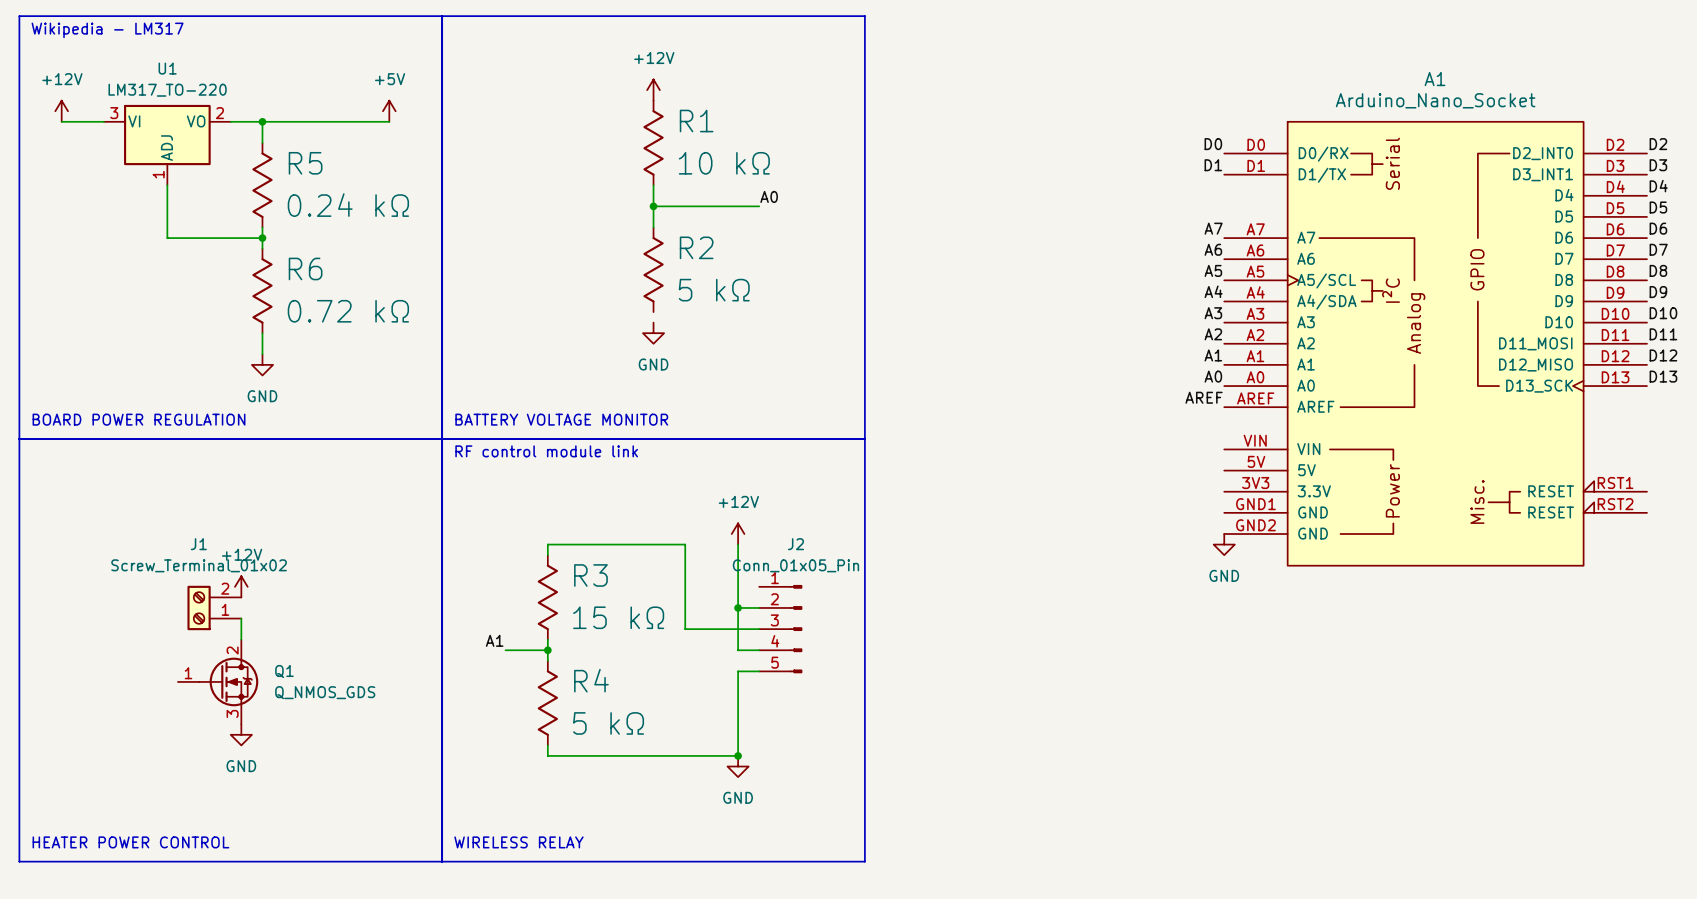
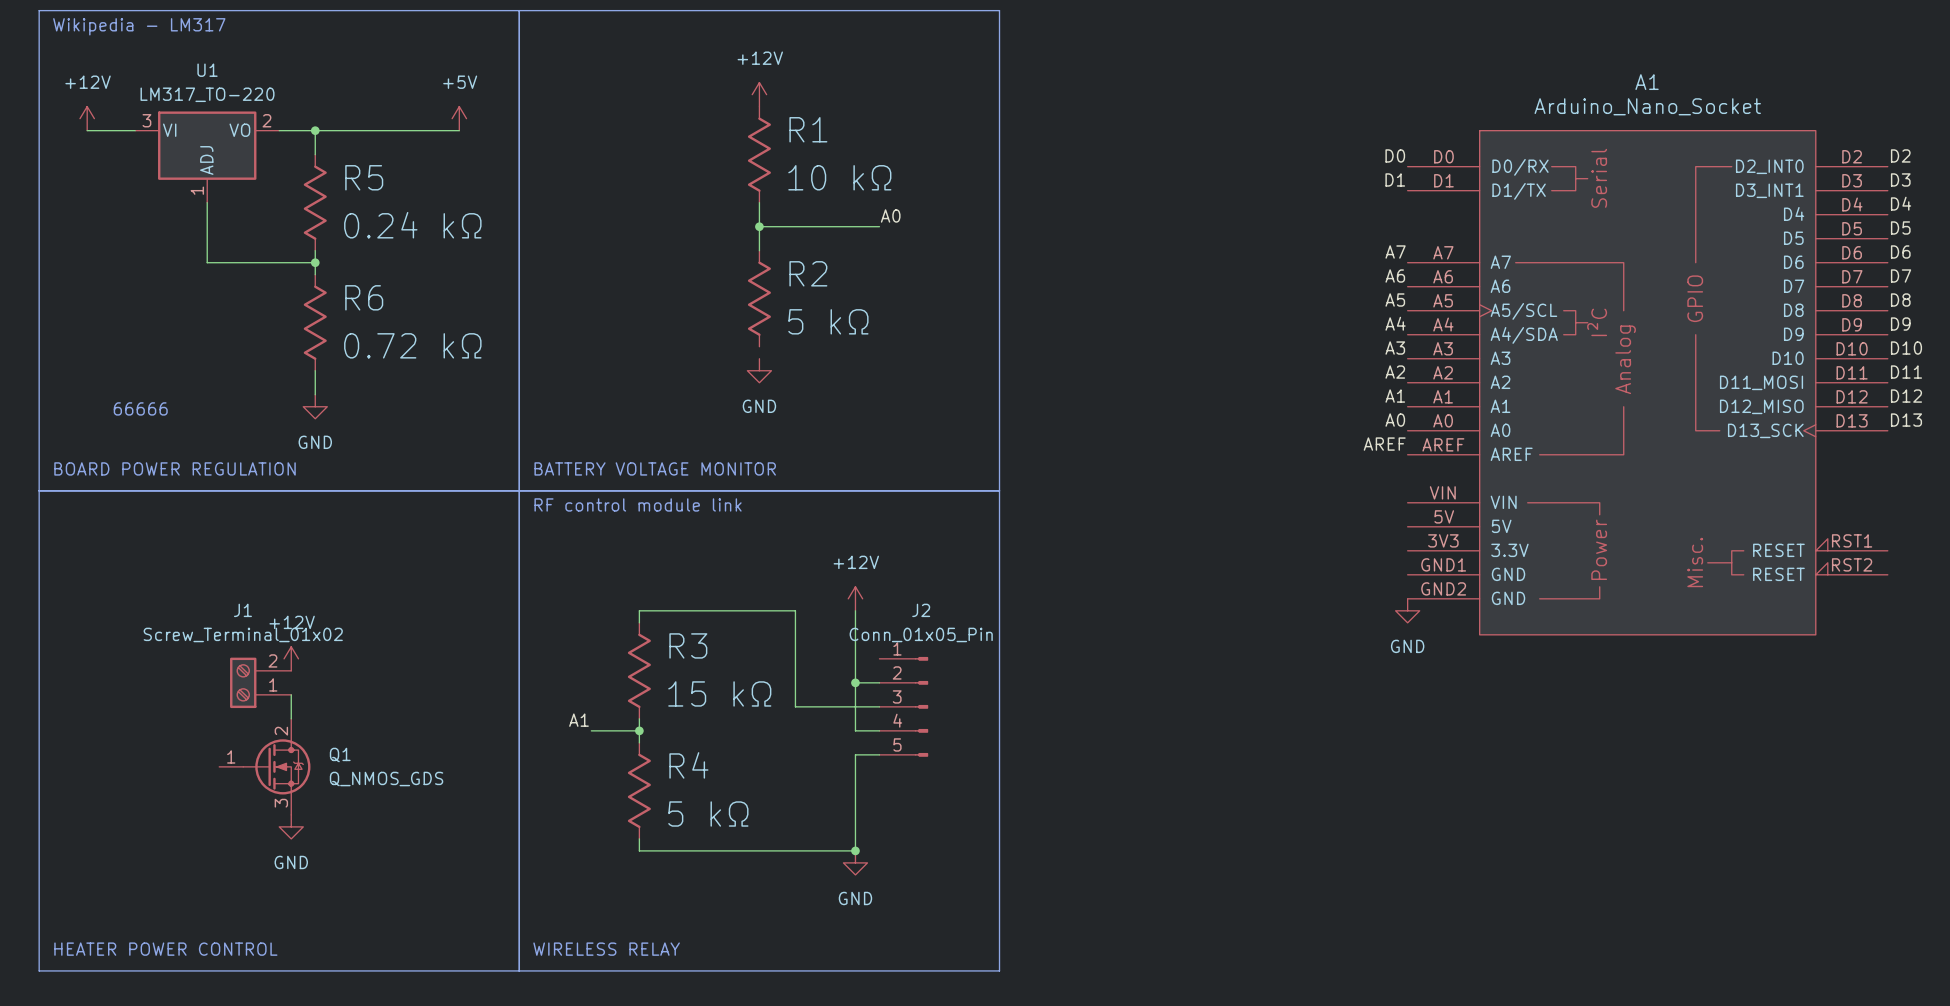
text: none -> 66666 (140, 408)

